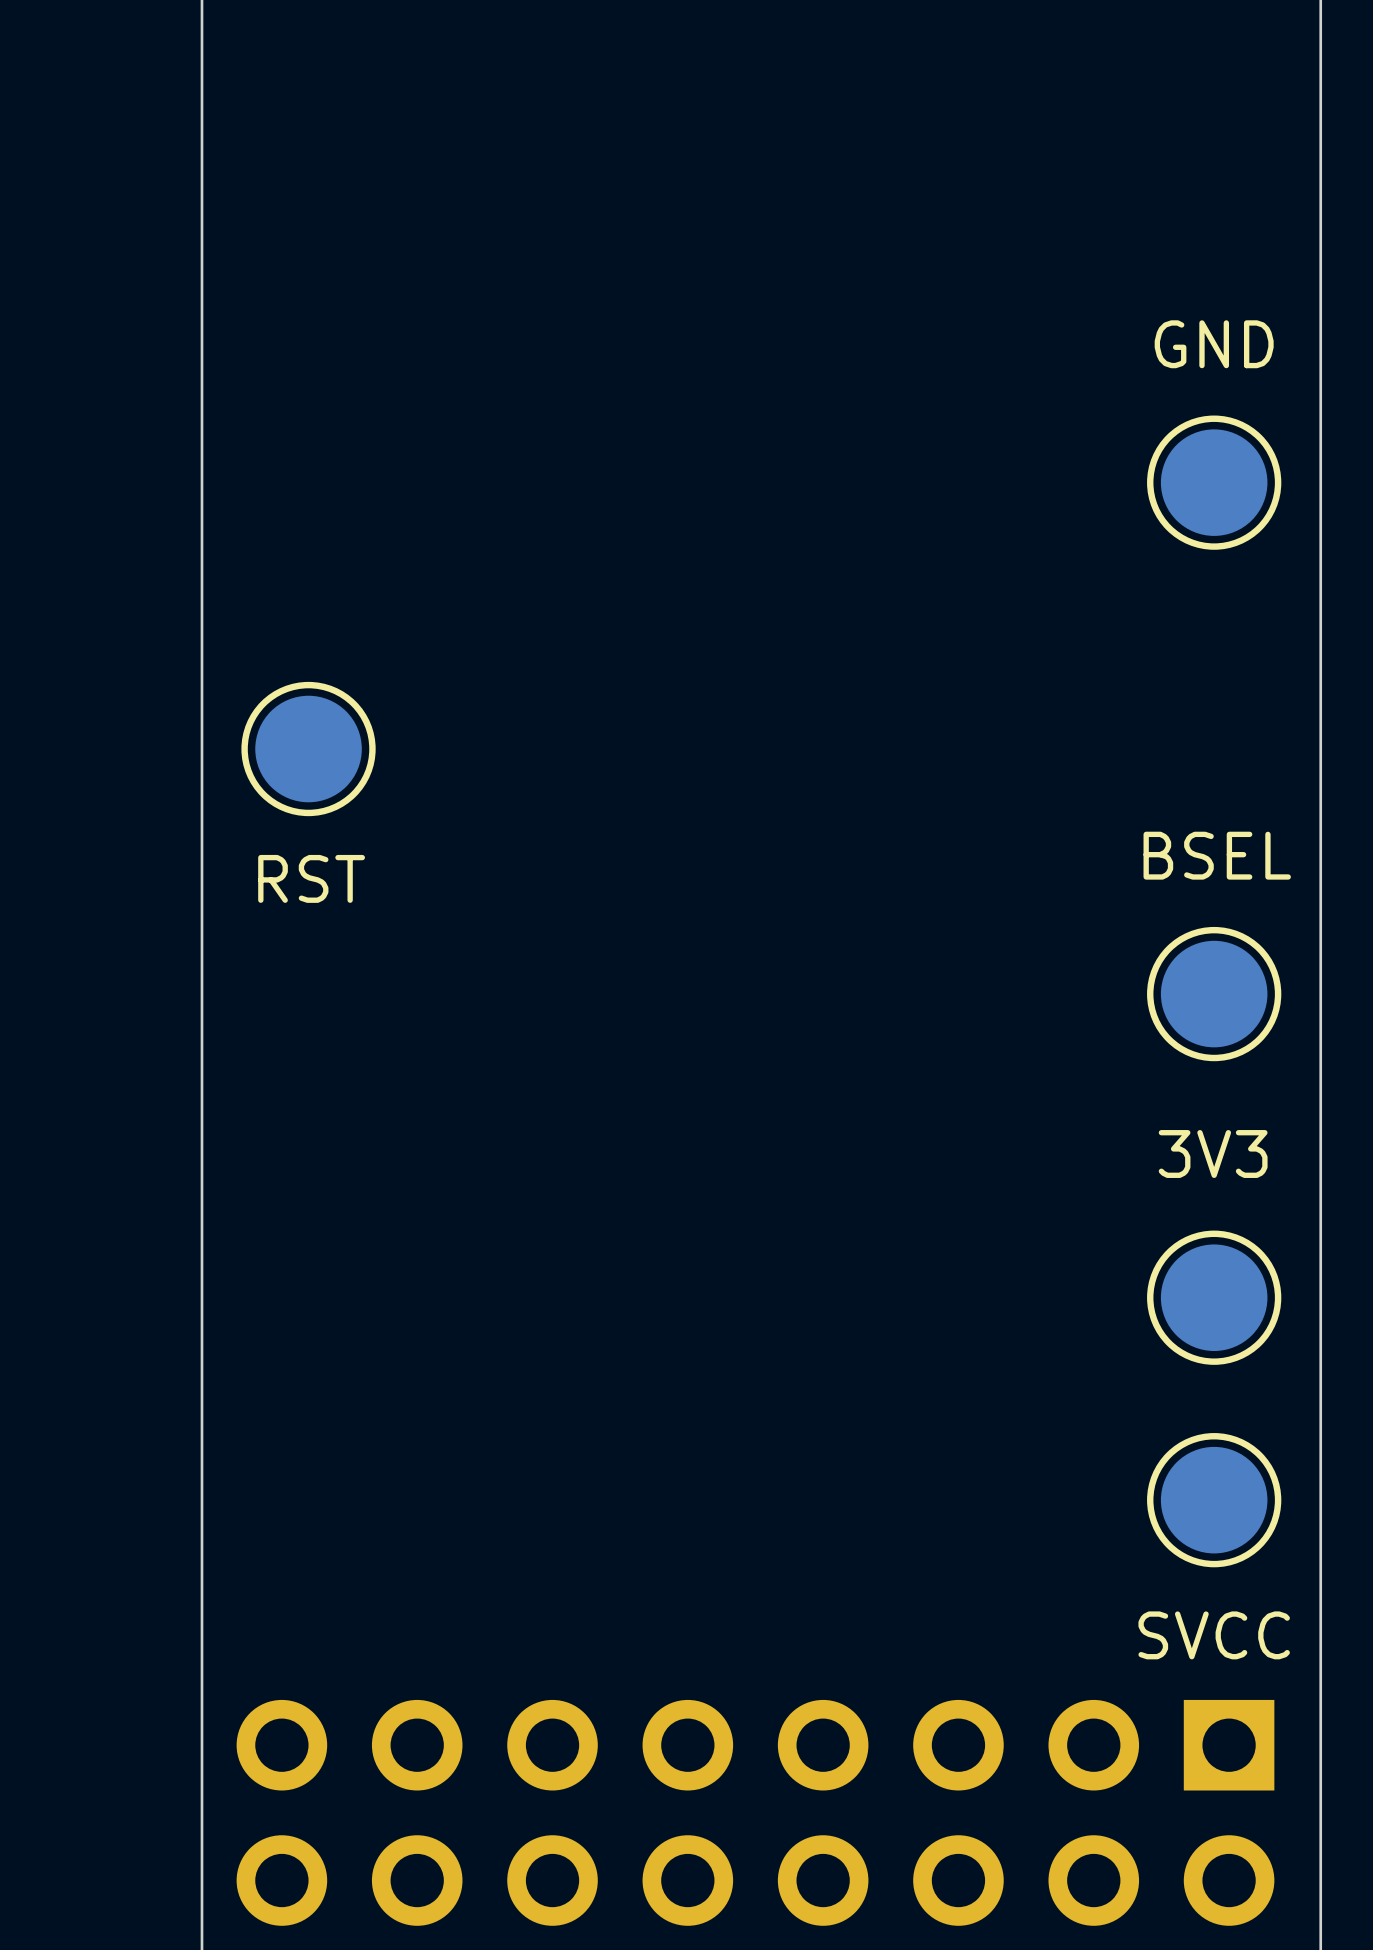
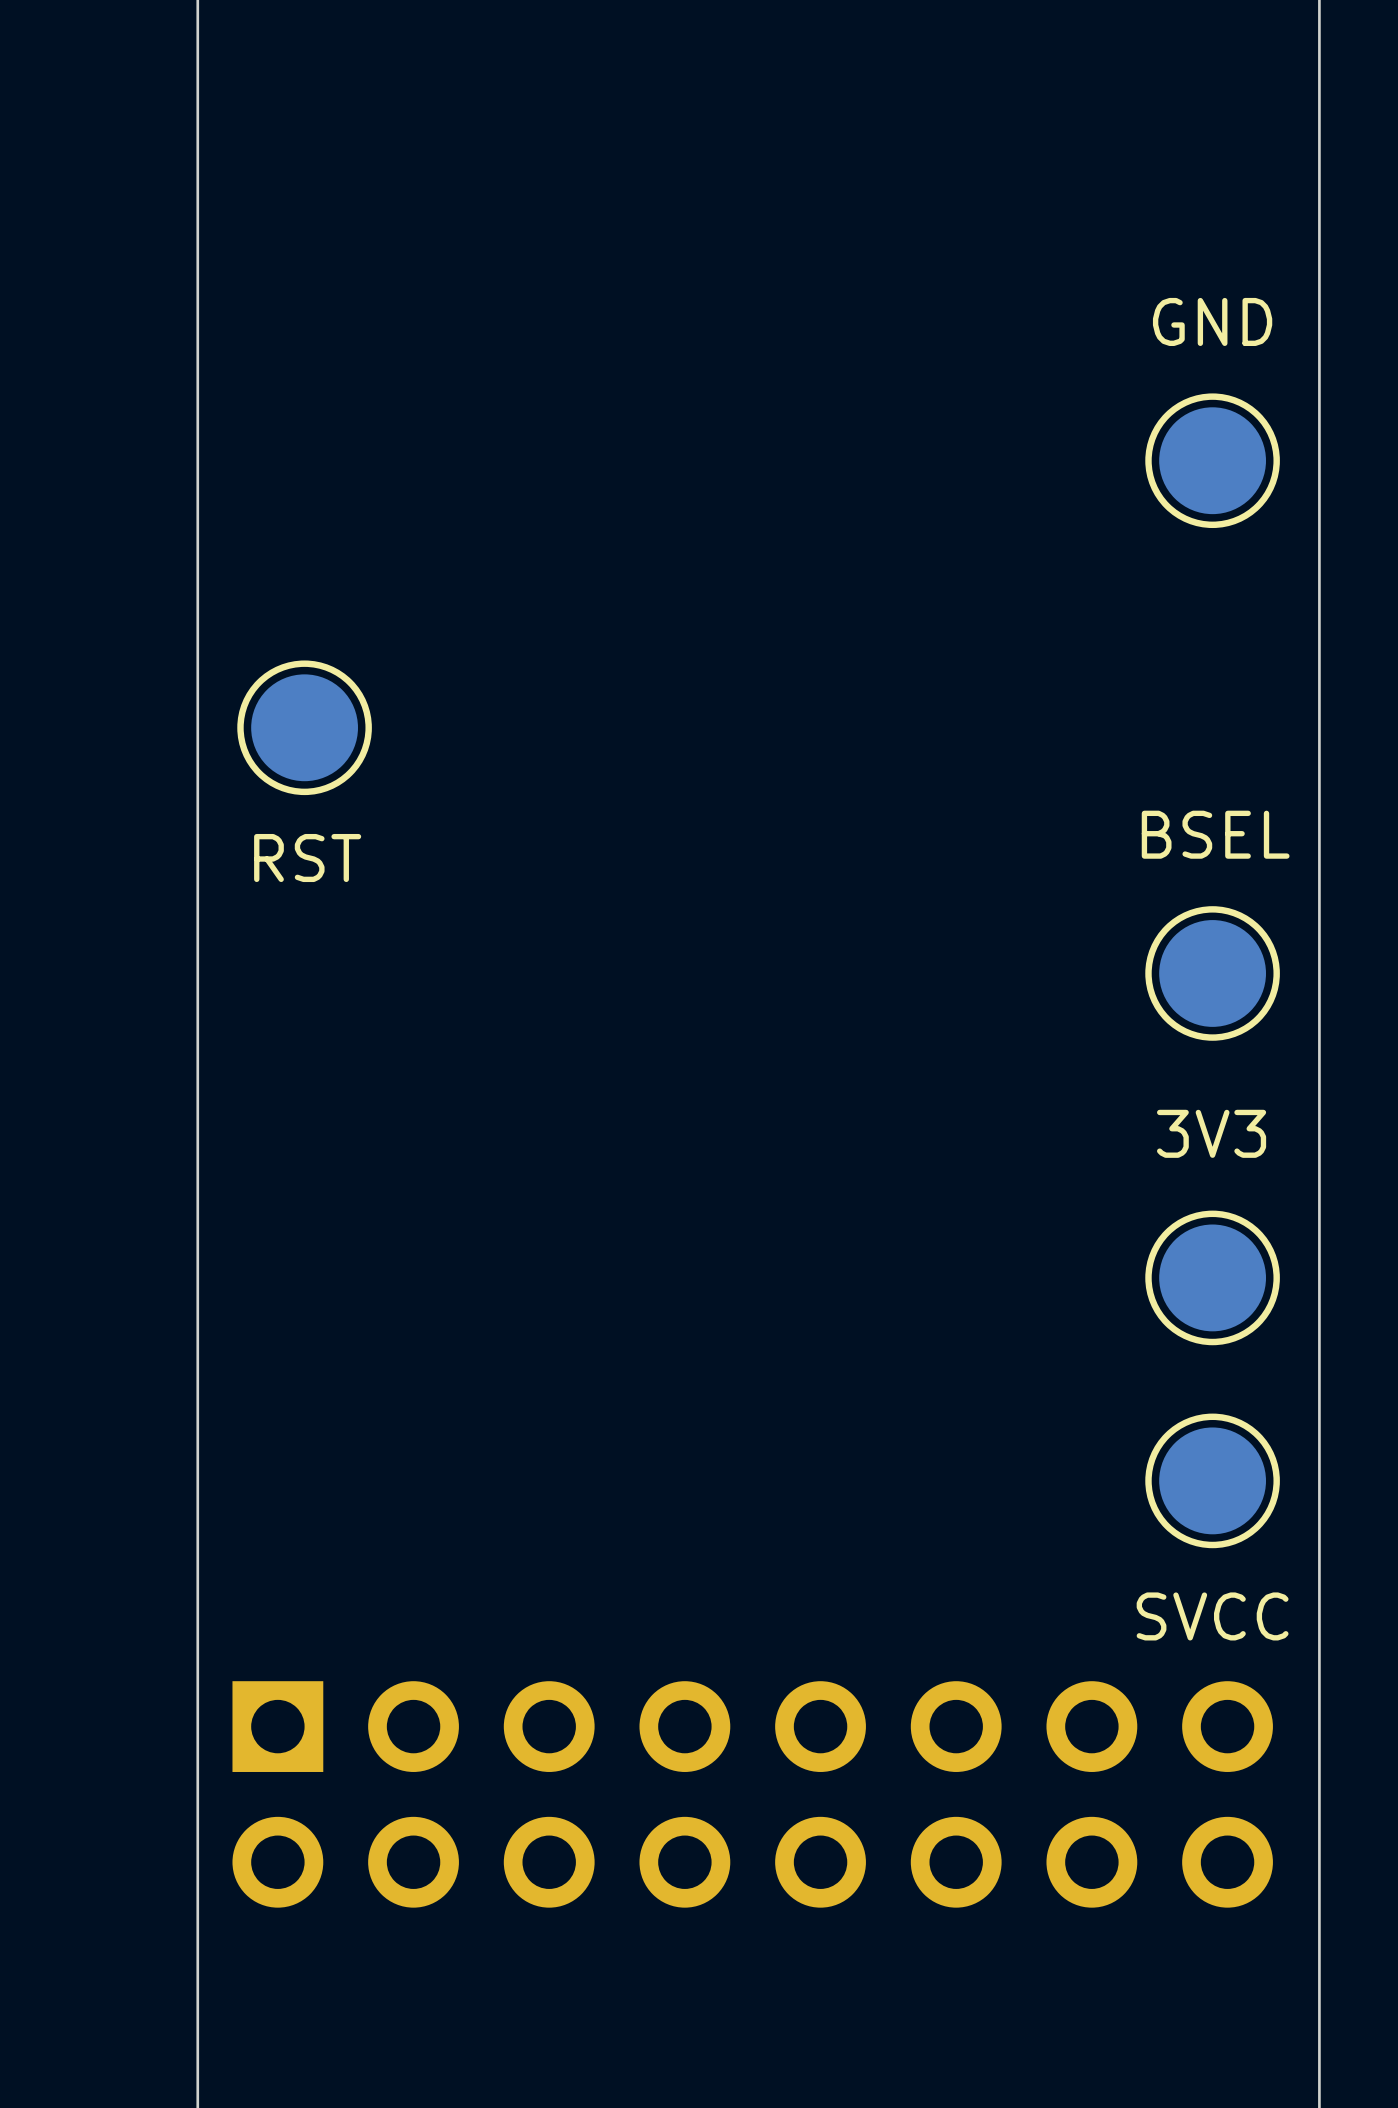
part footprint: [236, 1699, 1275, 1926] -> [232, 1681, 1273, 1908]

